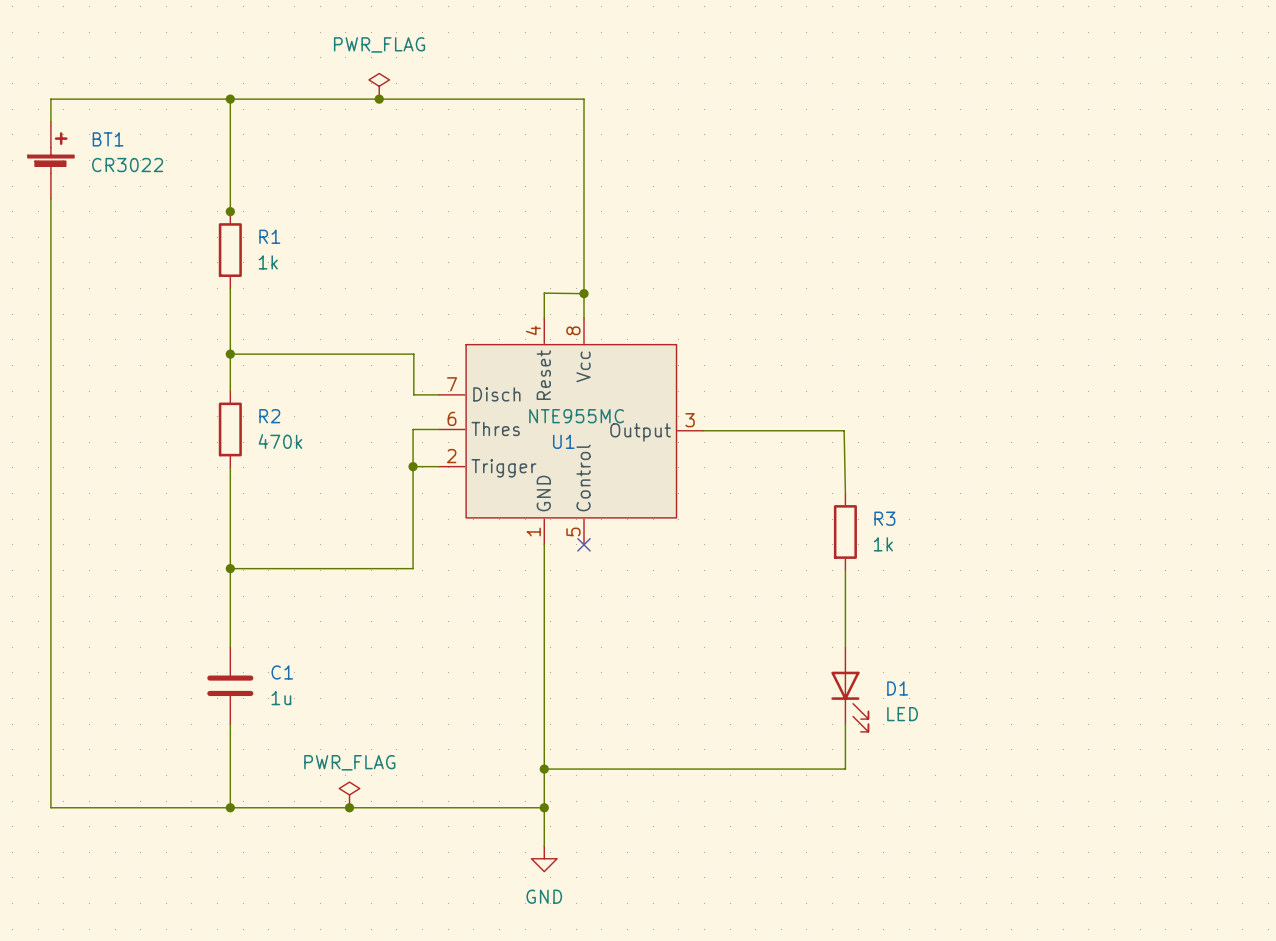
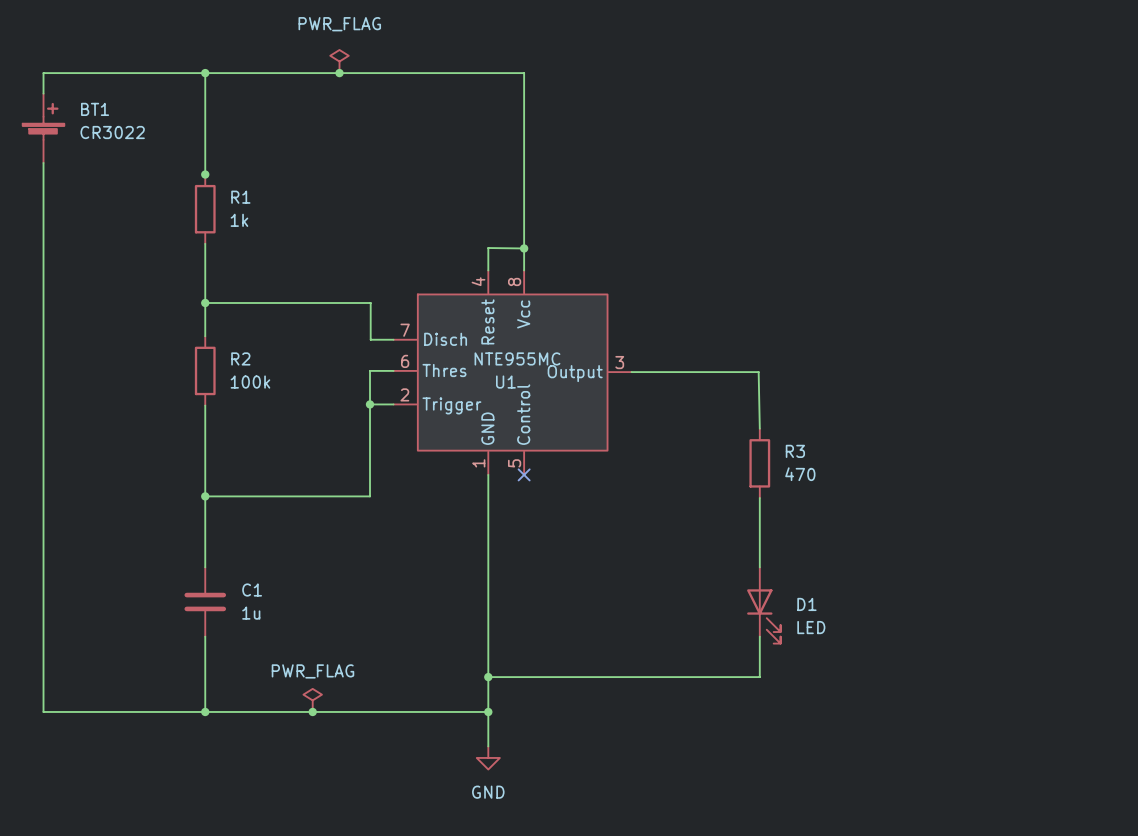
R2 value: 470k (280, 441) -> 100k (250, 382)
R3 value: 1k (883, 544) -> 470 (800, 474)

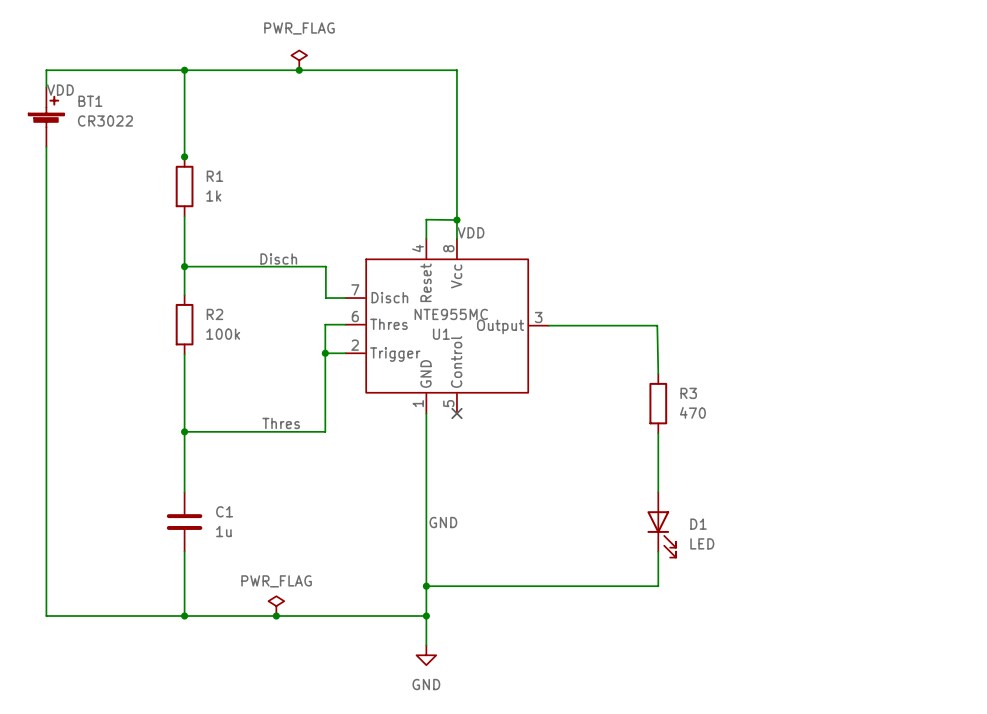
label: none -> VDD (60, 90)
label: none -> VDD (470, 232)
label: none -> Disch (278, 259)
label: none -> Thres (281, 423)
label: none -> GND (443, 522)

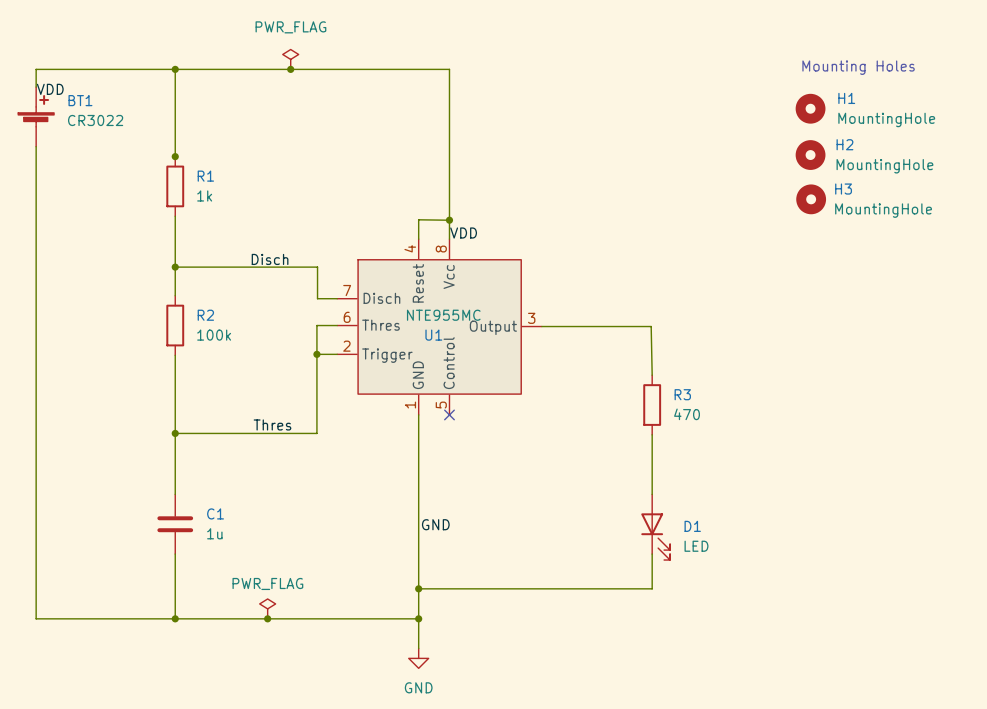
text: none -> Mounting Holes (858, 67)
H1: none -> MountingHole (810, 108)
H2: none -> MountingHole (810, 155)
H3: none -> MountingHole (811, 199)

